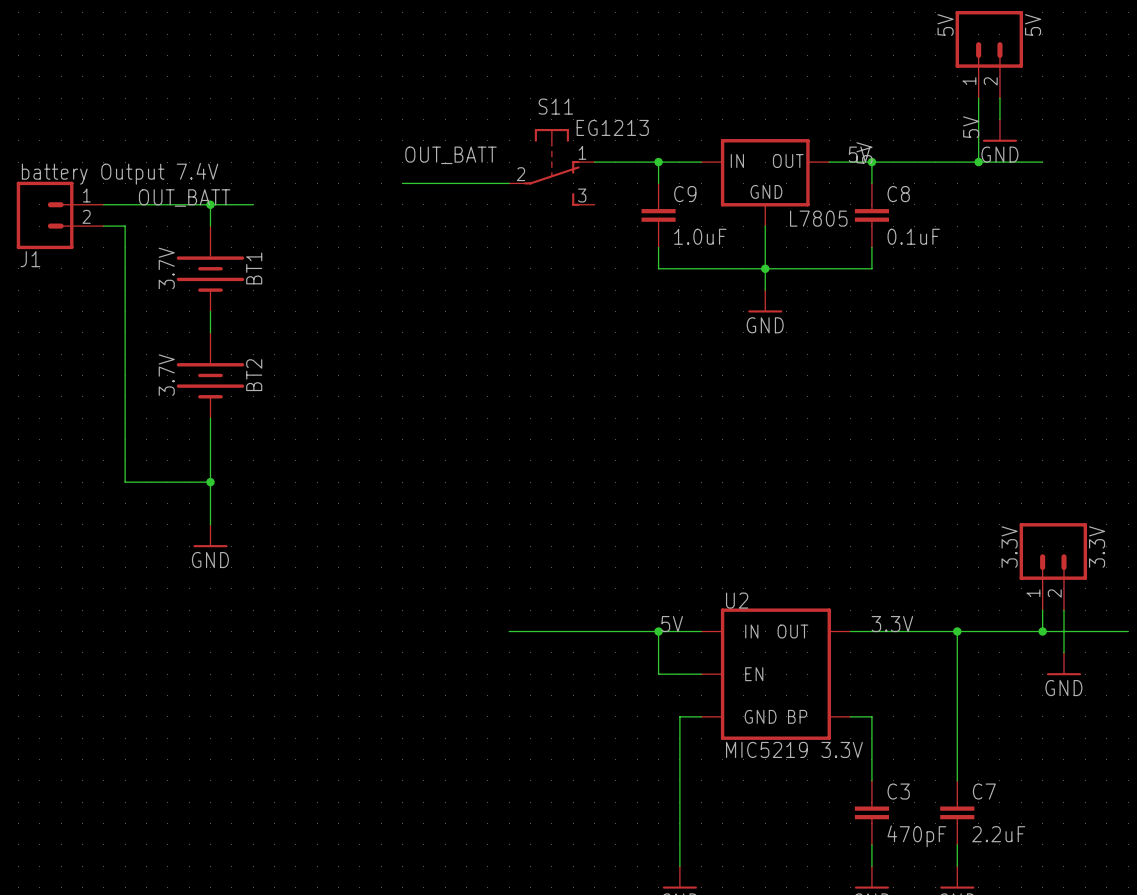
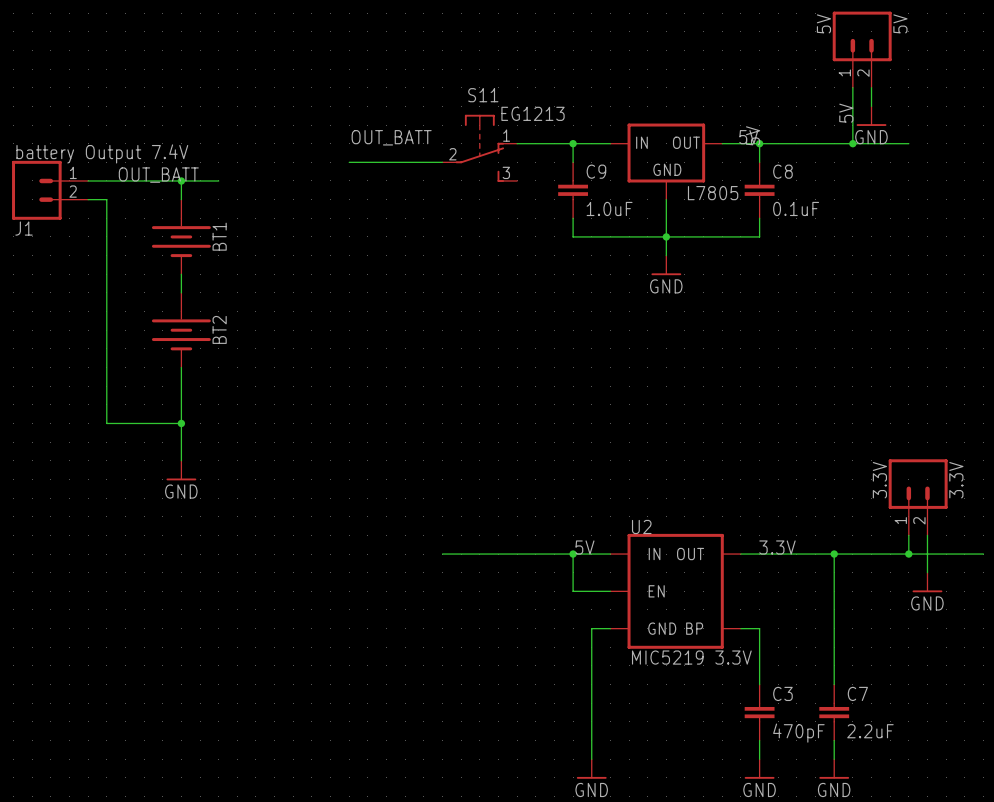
BT1 value: 3.7V (166, 268) -> none
BT2 value: 3.7V (166, 375) -> none

